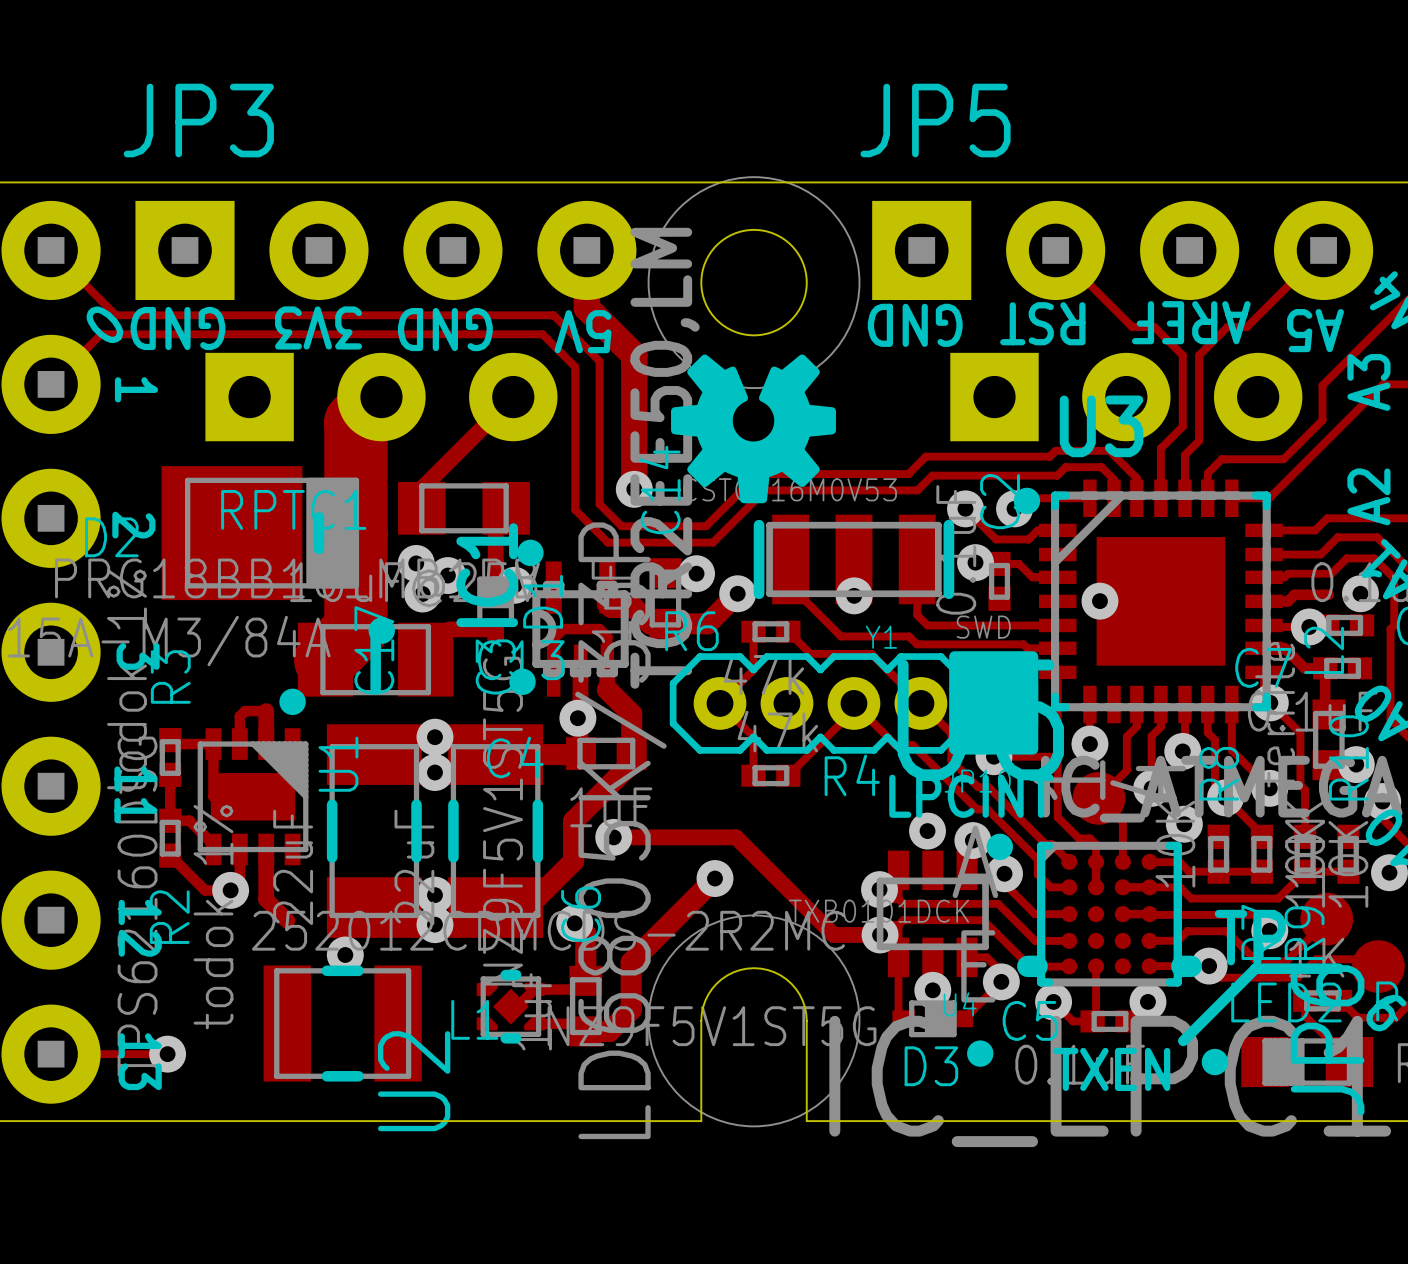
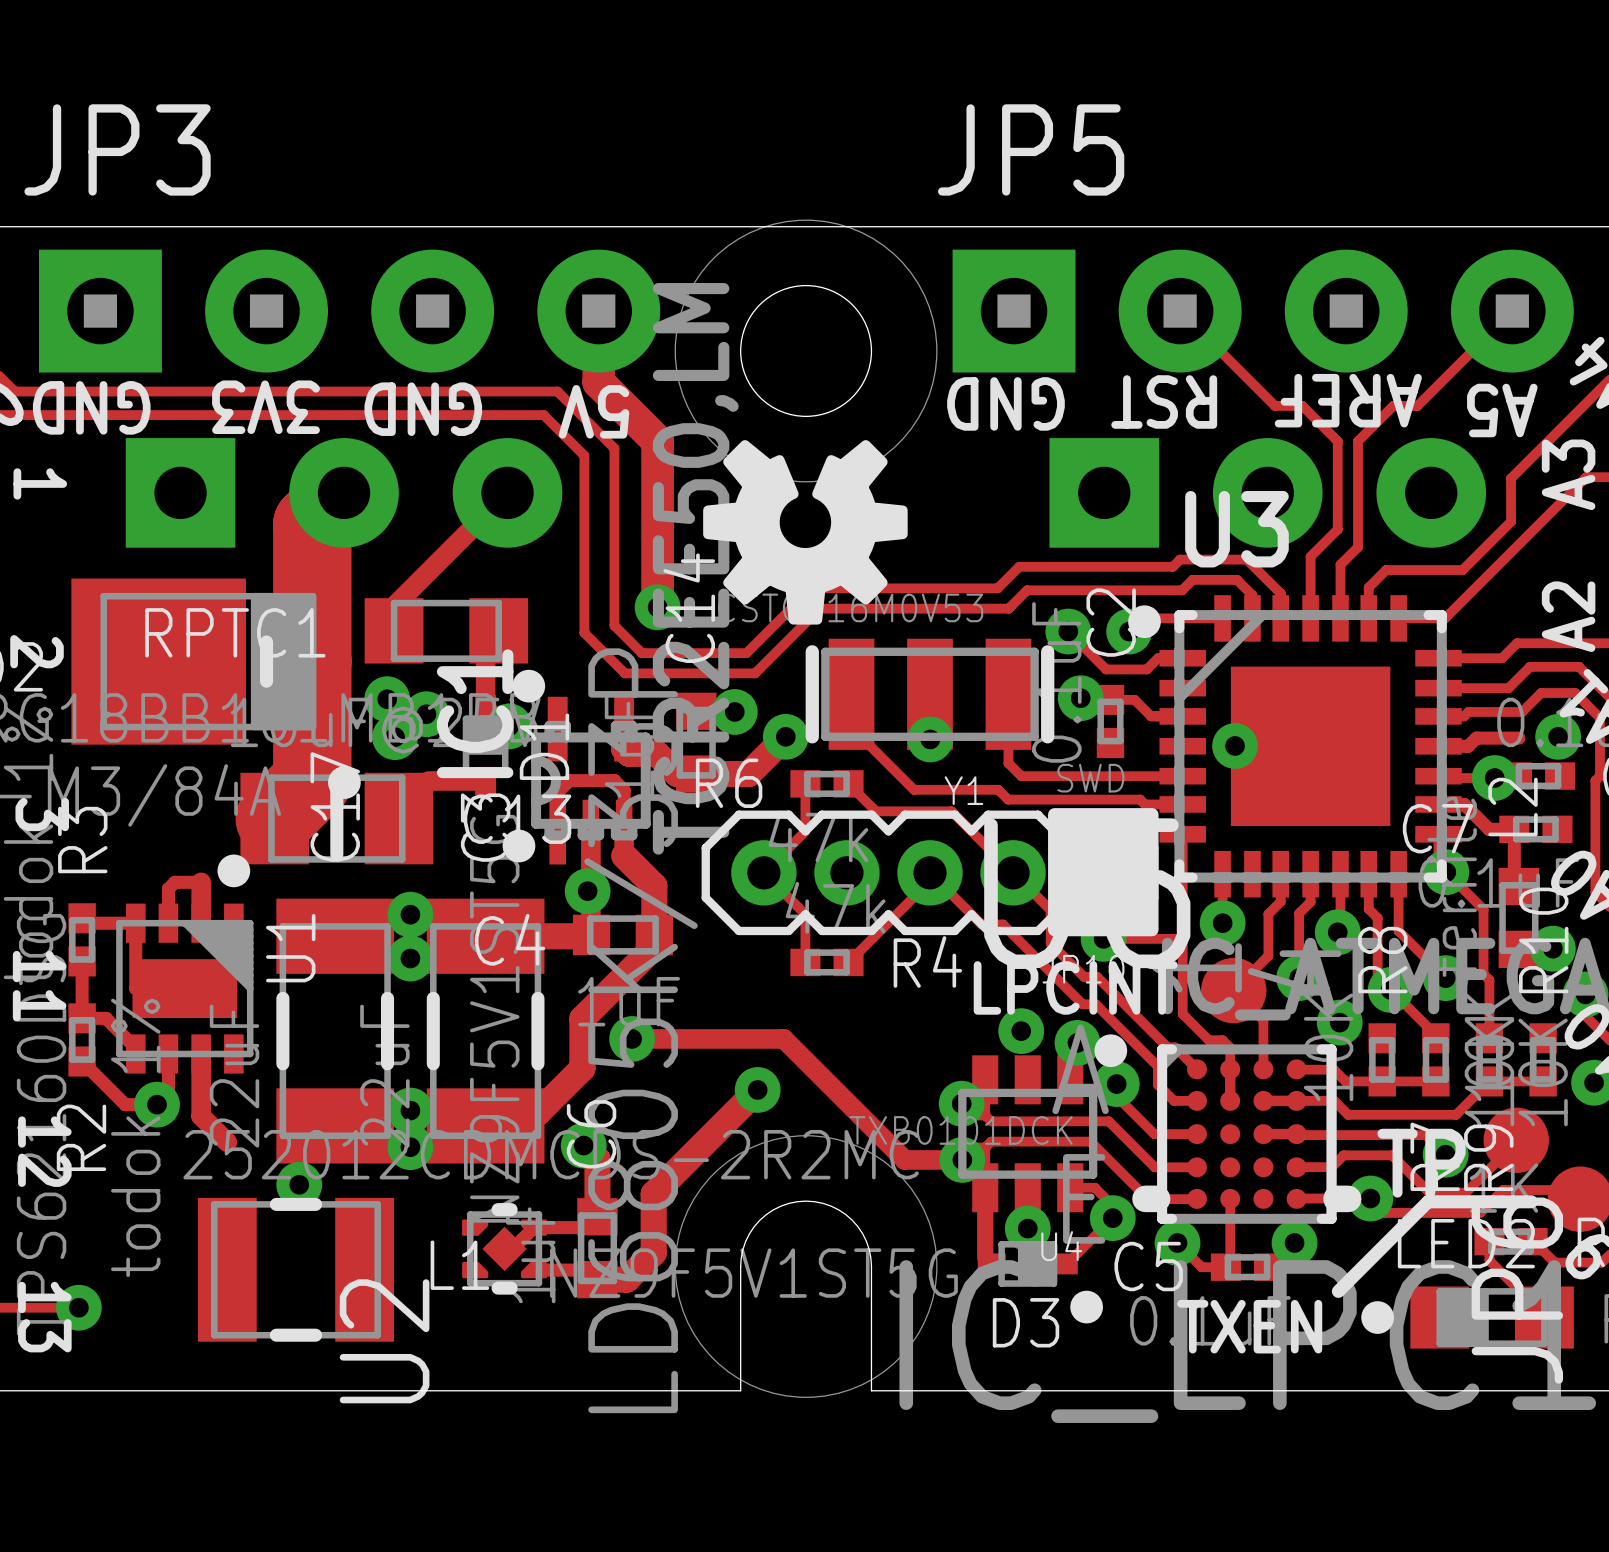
track width: thin (898, 957) (898, 1013) -> thick (985, 1187) (985, 1257)

